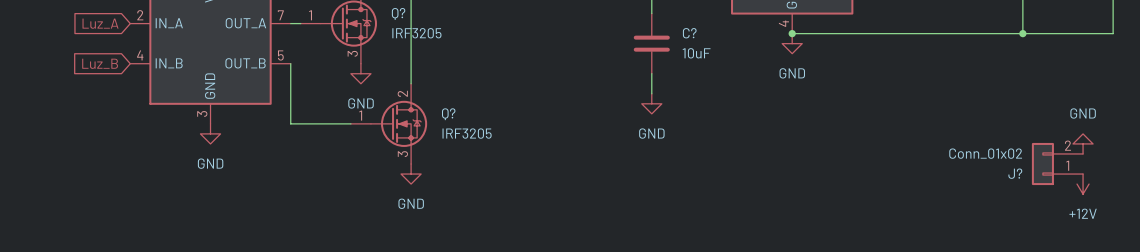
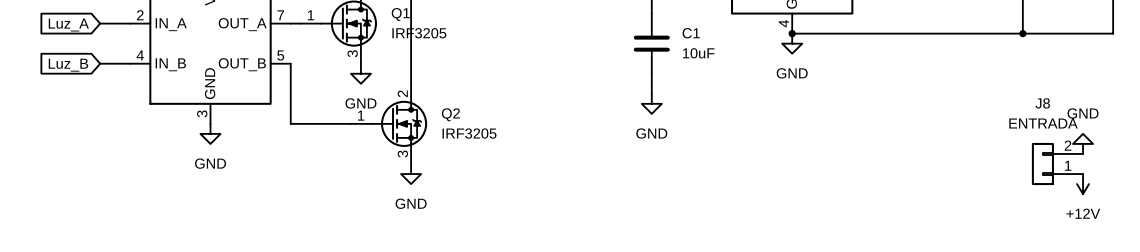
Q? name: Q? (398, 13) -> Q1 (400, 14)
wire: none -> (100, 23) (130, 23)
global label position: Luz_A (100, 23) -> Luz_A (68, 25)
C? name: C? (689, 33) -> C1 (691, 33)
wire: none -> (100, 63) (130, 63)
global label position: Luz_B (100, 63) -> Luz_B (68, 65)
Q? name: Q? (448, 114) -> Q2 (450, 114)
J? value: Conn_01x02 (985, 153) -> ENTRADA (1043, 123)
J? name: J? (1015, 173) -> J8 (1042, 103)

